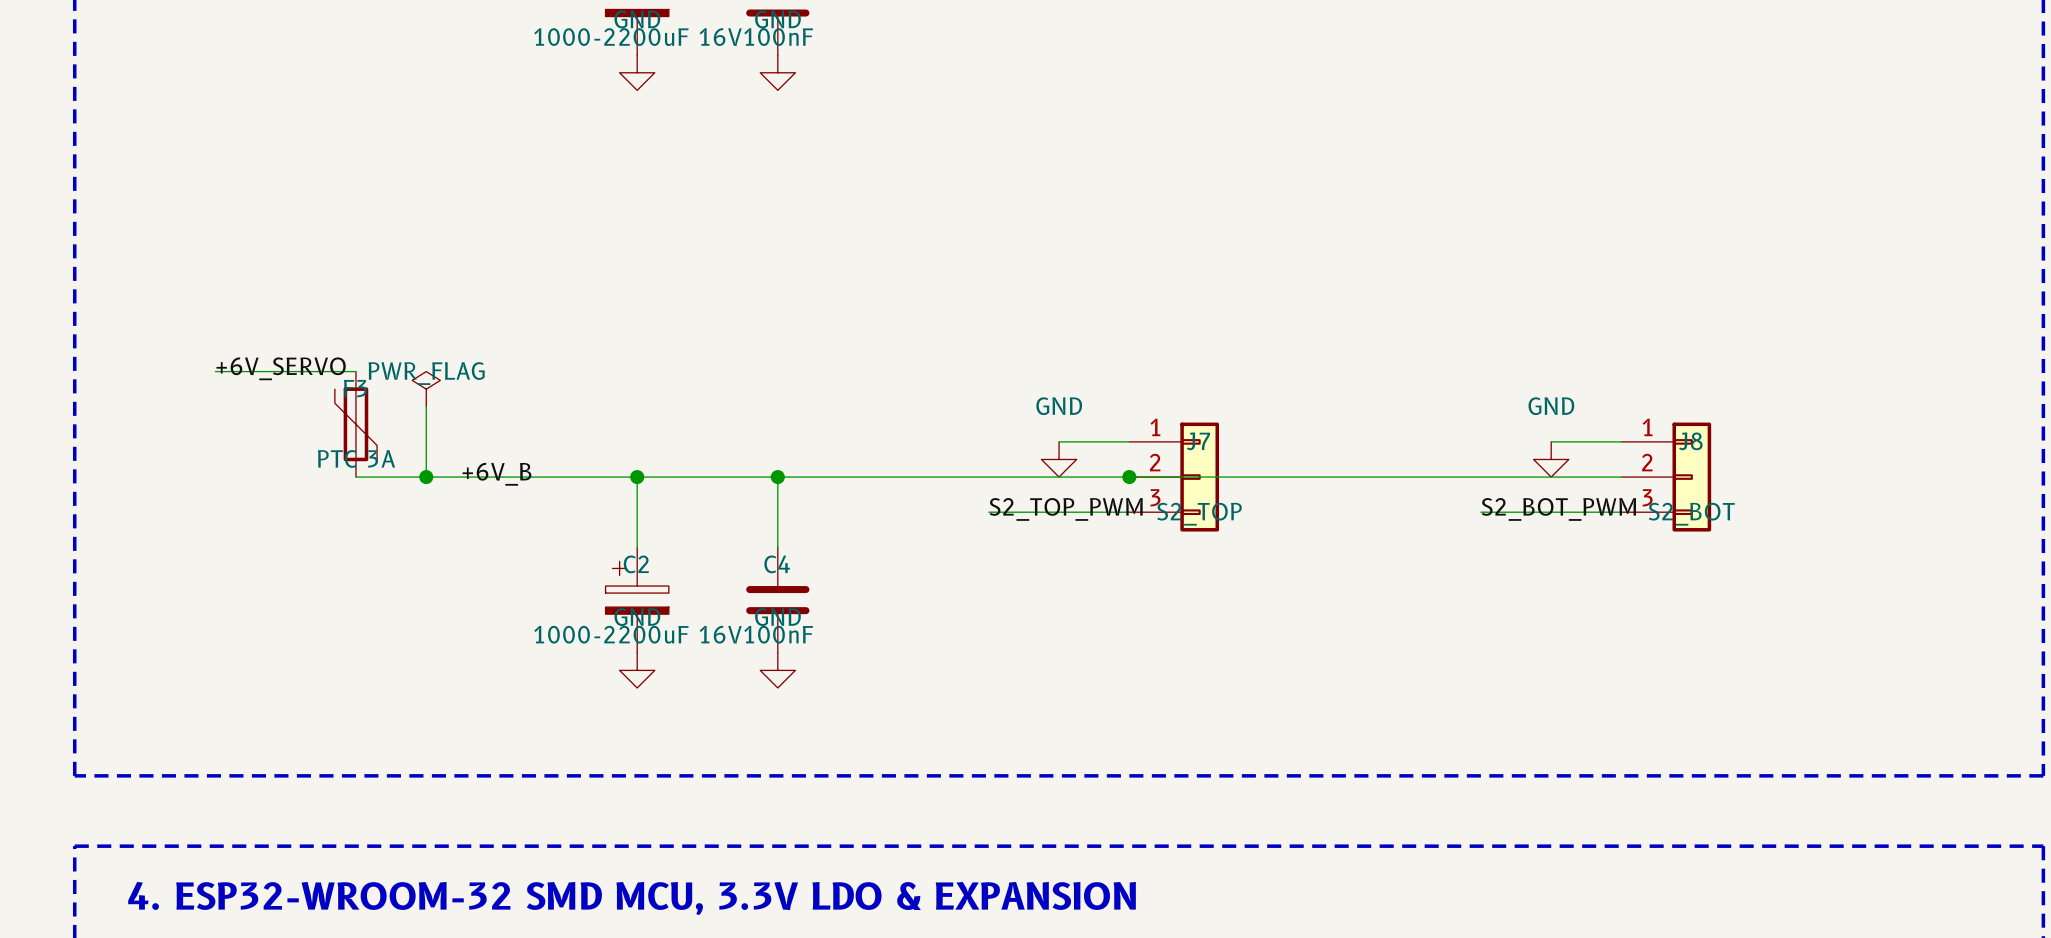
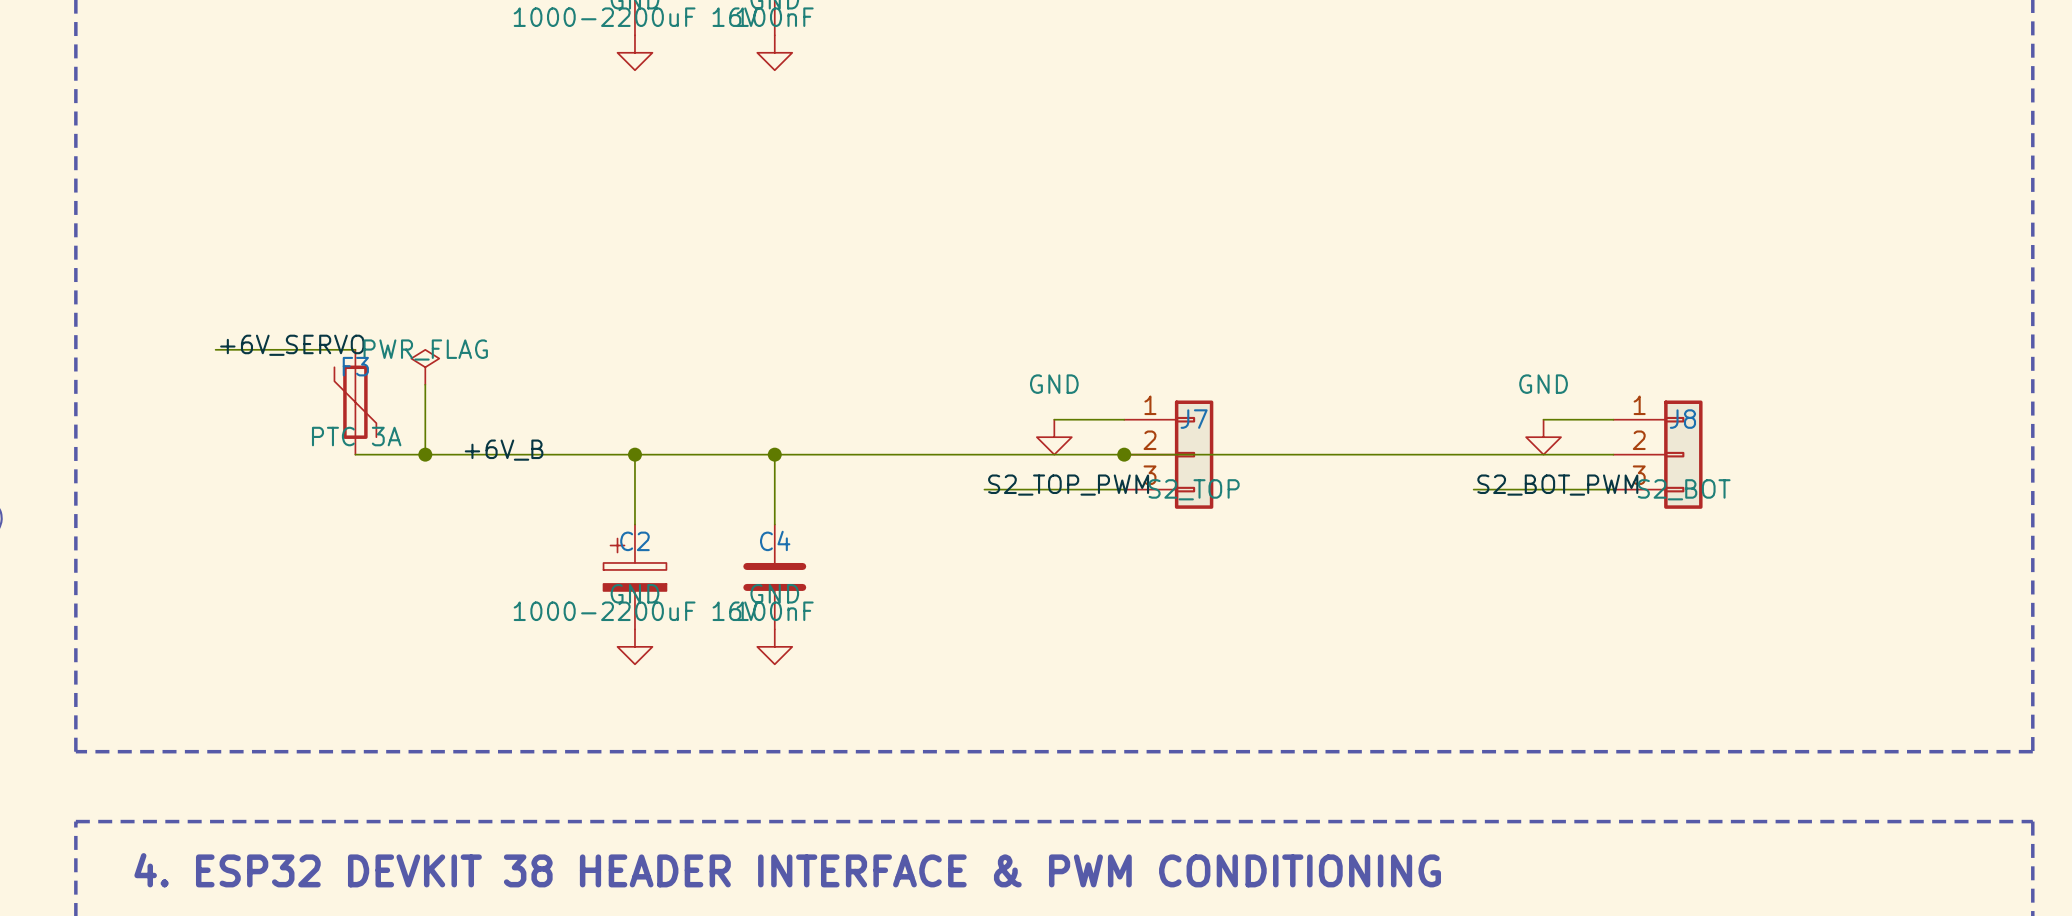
text: 4. ESP32-WROOM-32 SMD MCU, 3.3V LDO & EXPANSION (632, 898) -> 4. ESP32 DEVKIT 38 HEADER INTERFACE & PWM CONDITIONING (787, 870)

